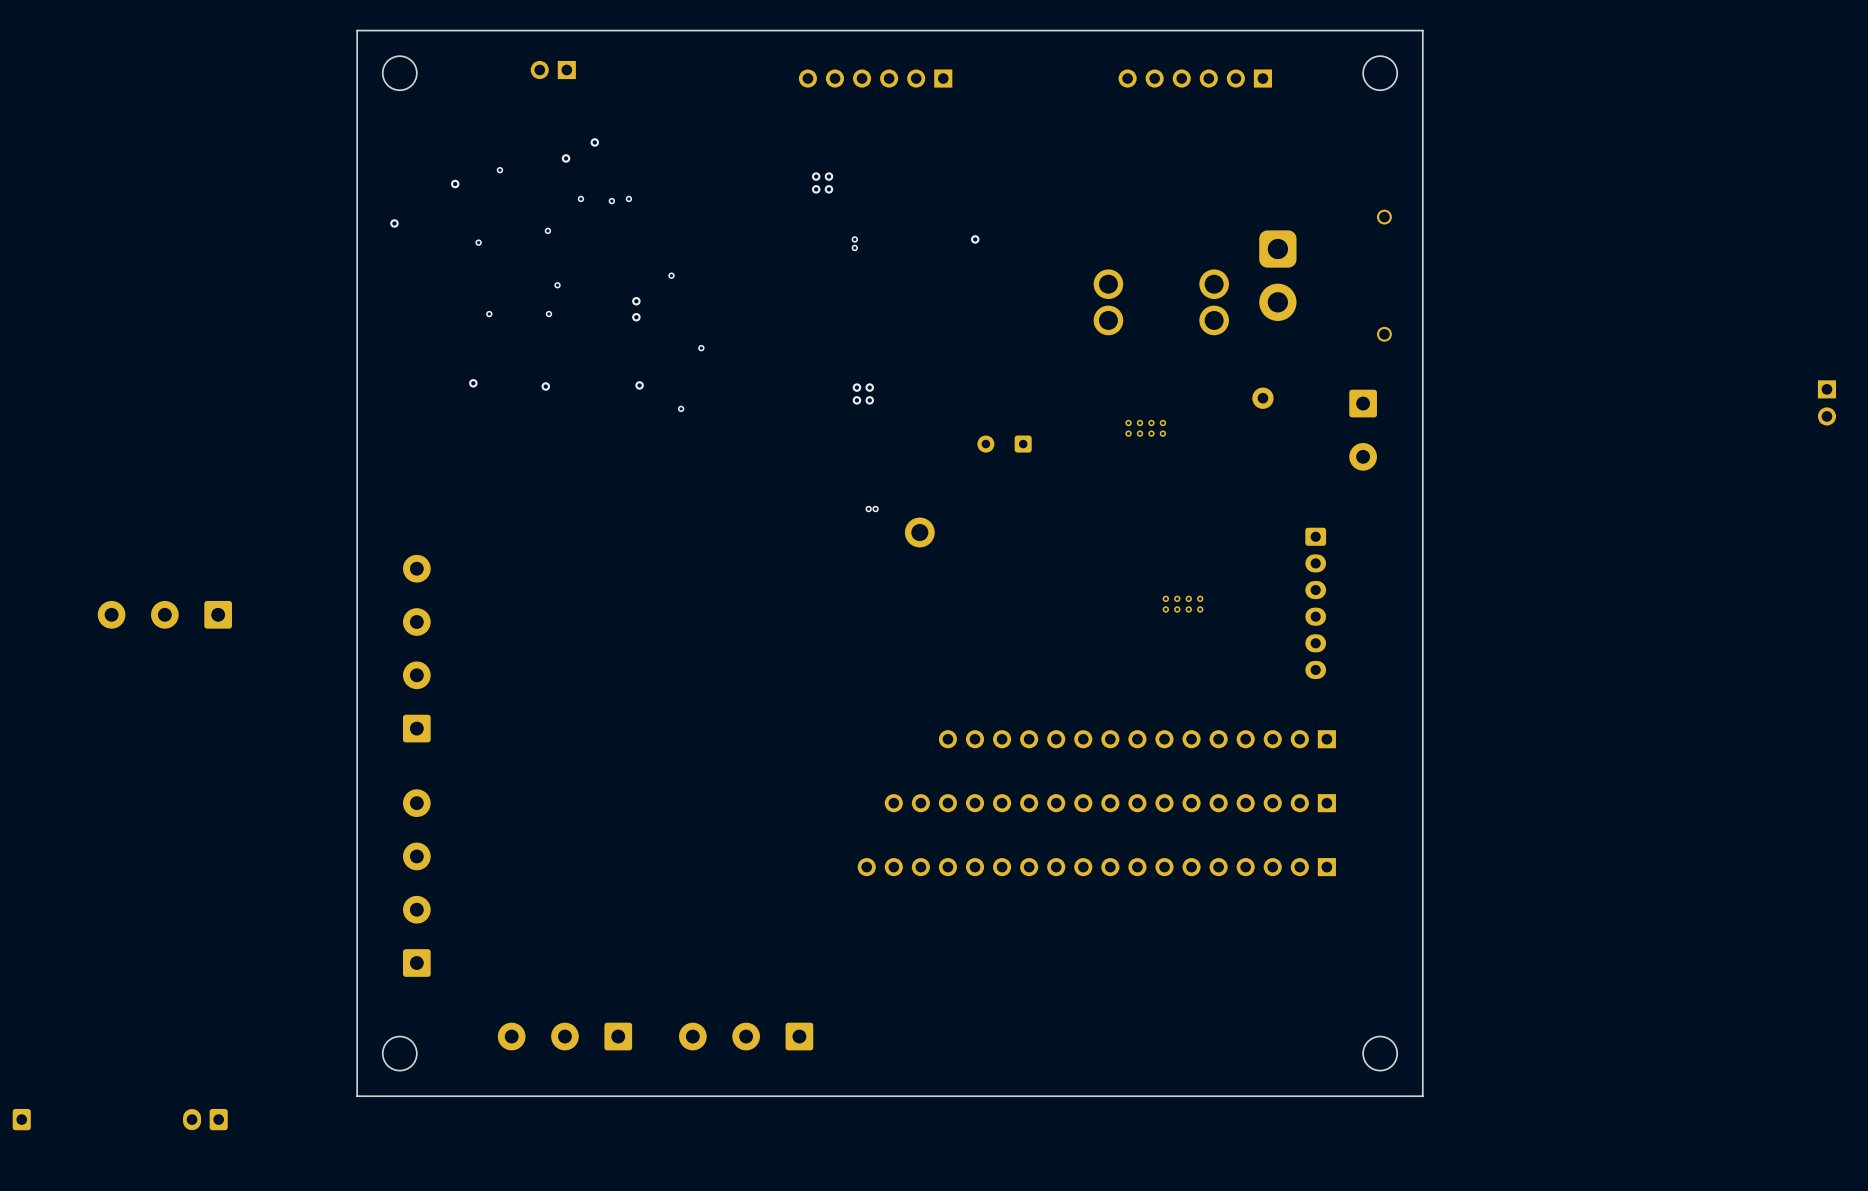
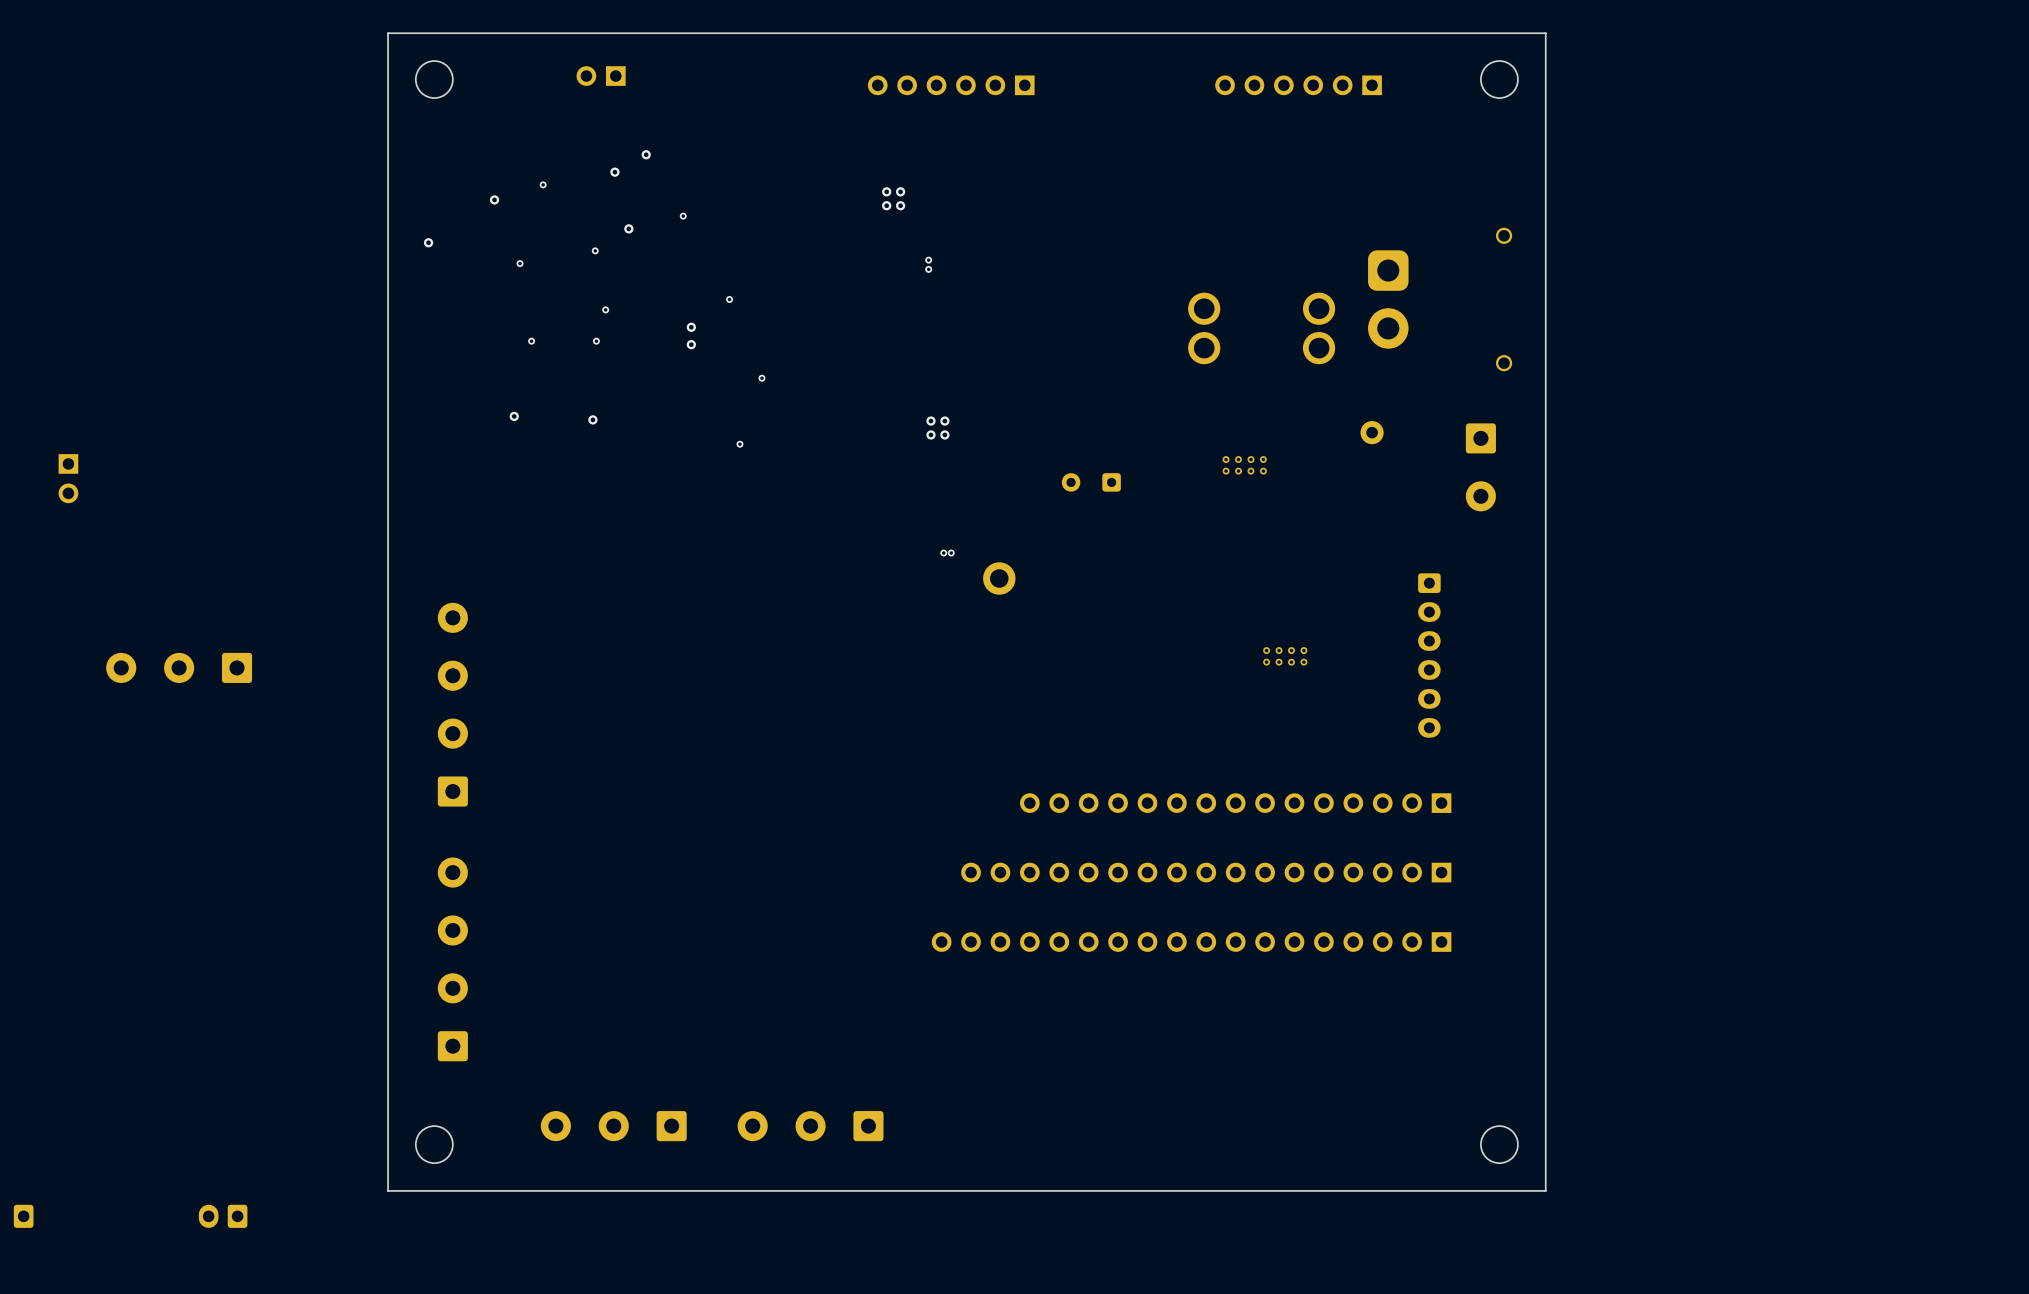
via: (580, 198) -> none
via: (611, 201) -> none
via: none -> (628, 228)
via: (975, 239) -> none
via: (639, 385) -> none
part: (1826, 402) -> none
part: none -> (68, 478)

